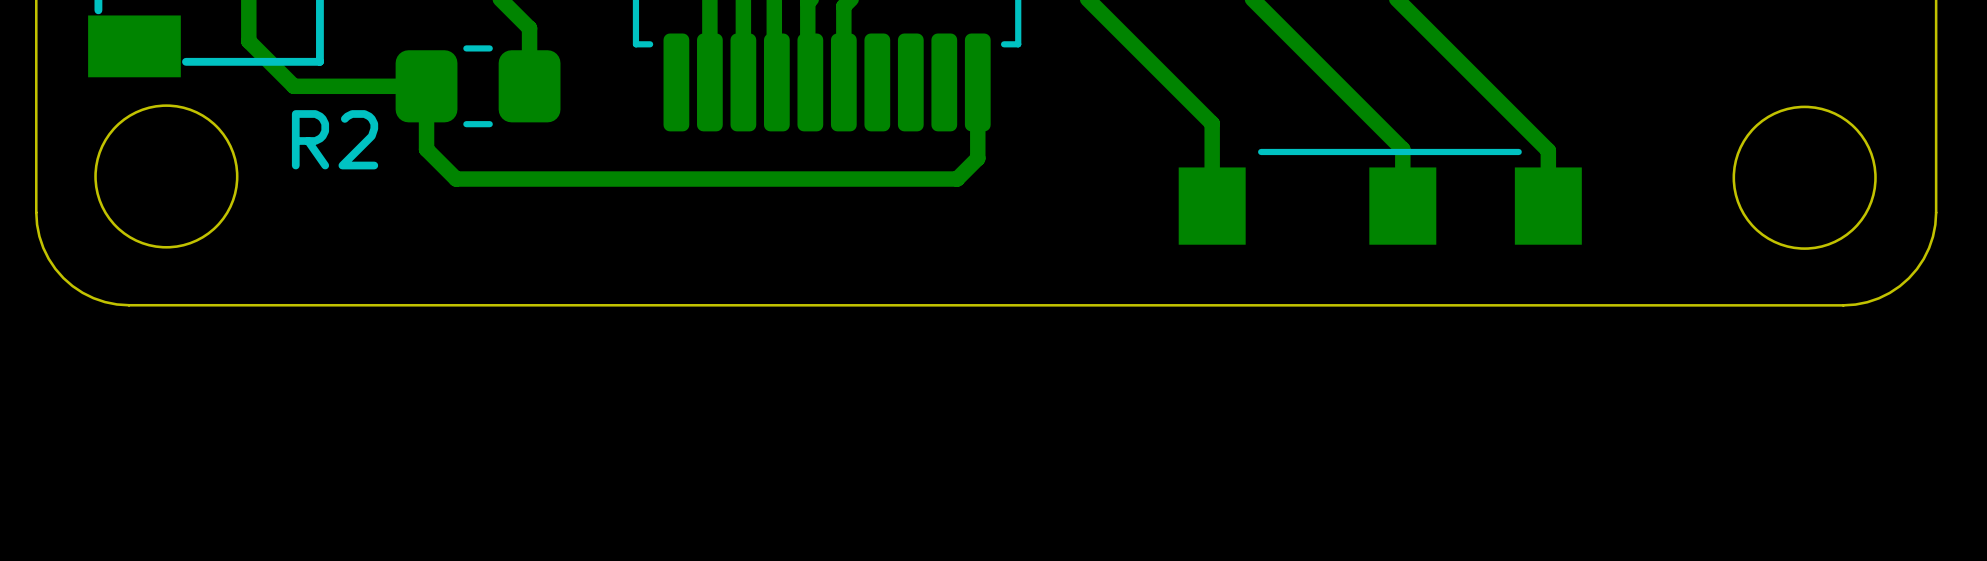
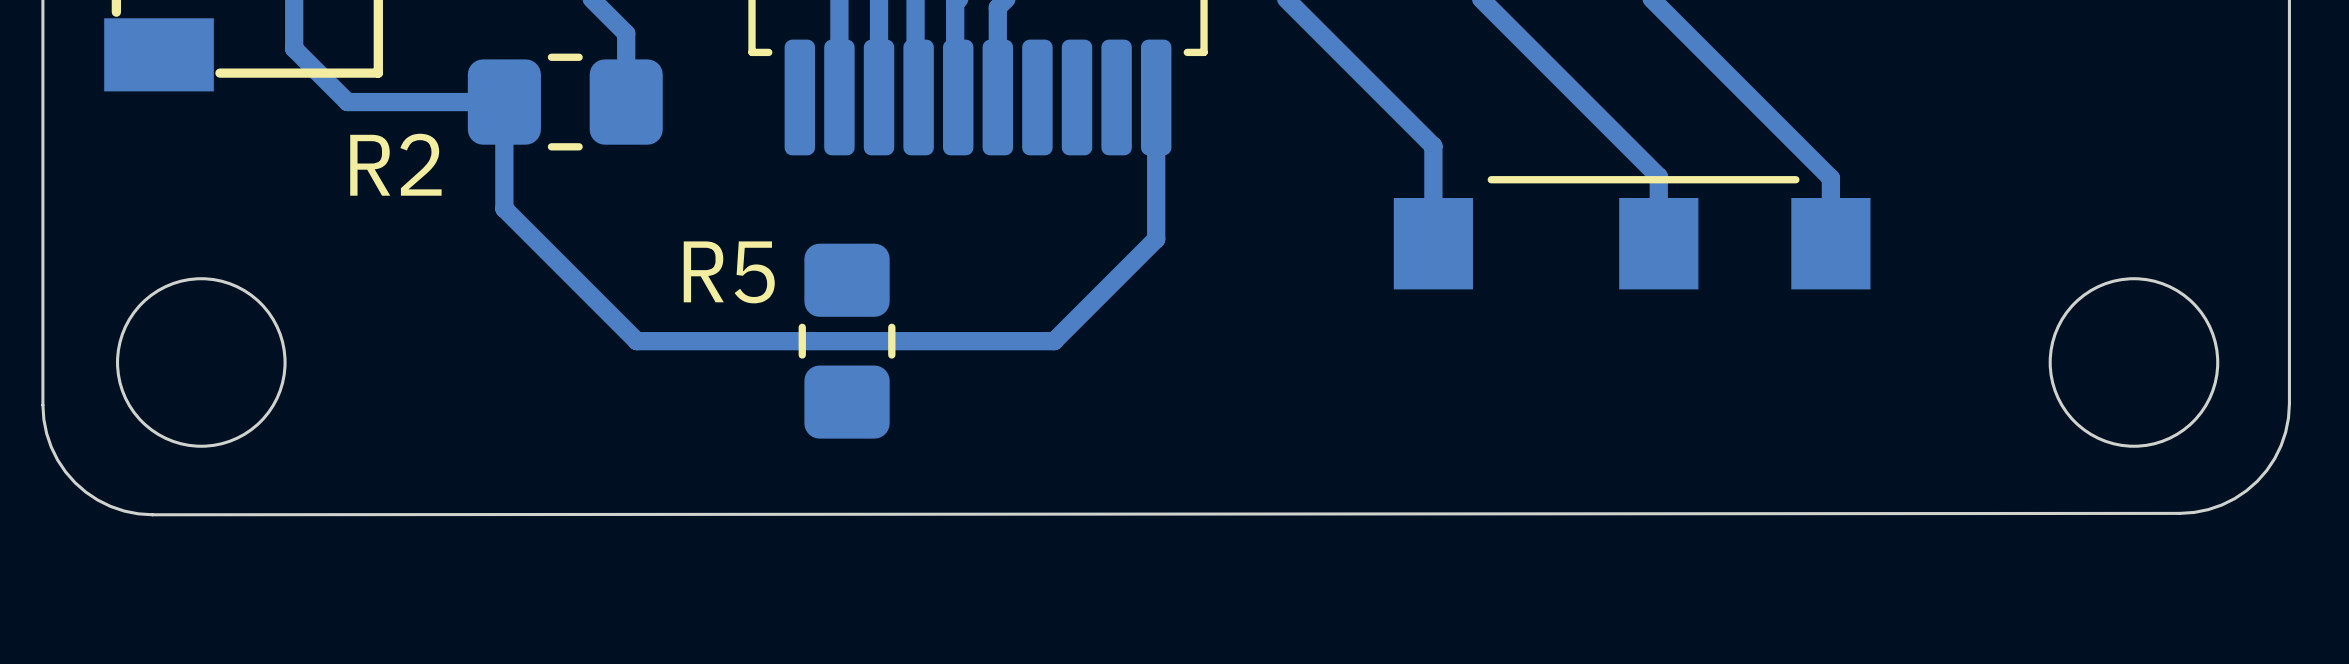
track: (426, 149) (456, 179) (957, 179) (977, 158) -> (504, 176) (504, 208) (636, 341) (1054, 341) (1156, 239) (1156, 187)
round board edge position: (166, 176) -> (201, 362)
round board edge position: (1804, 177) -> (2133, 362)
board edge: (36, 212) (37, 224) (43, 248) (55, 268) (63, 278) (82, 292) (93, 298) (105, 302) (129, 305) (1843, 305) (1855, 304) (1878, 298) (1889, 292) (1908, 278) (1923, 259) (1929, 248) (1935, 224) (1936, 212) -> (42, 251) (42, 405) (43, 419) (51, 447) (65, 471) (75, 482) (97, 500) (124, 511) (152, 514) (2194, 512) (2221, 505) (2246, 490) (2266, 470) (2281, 445) (2285, 432) (2289, 403) (2289, 251)
R5: none -> (847, 341)

